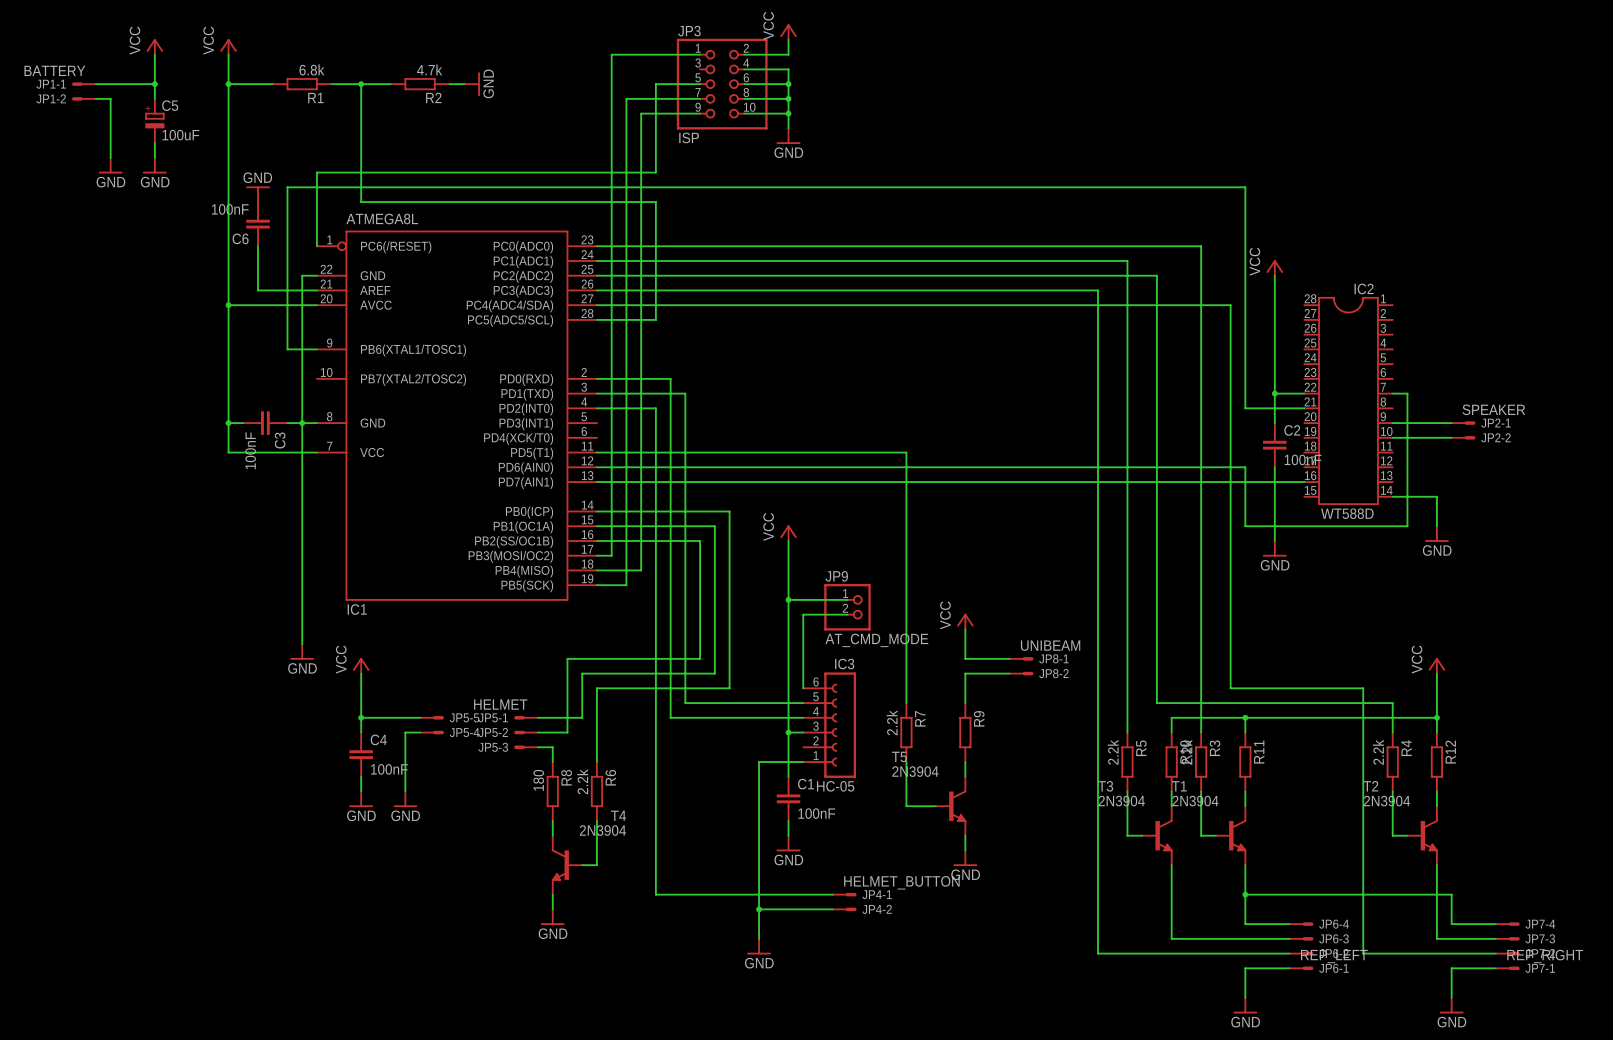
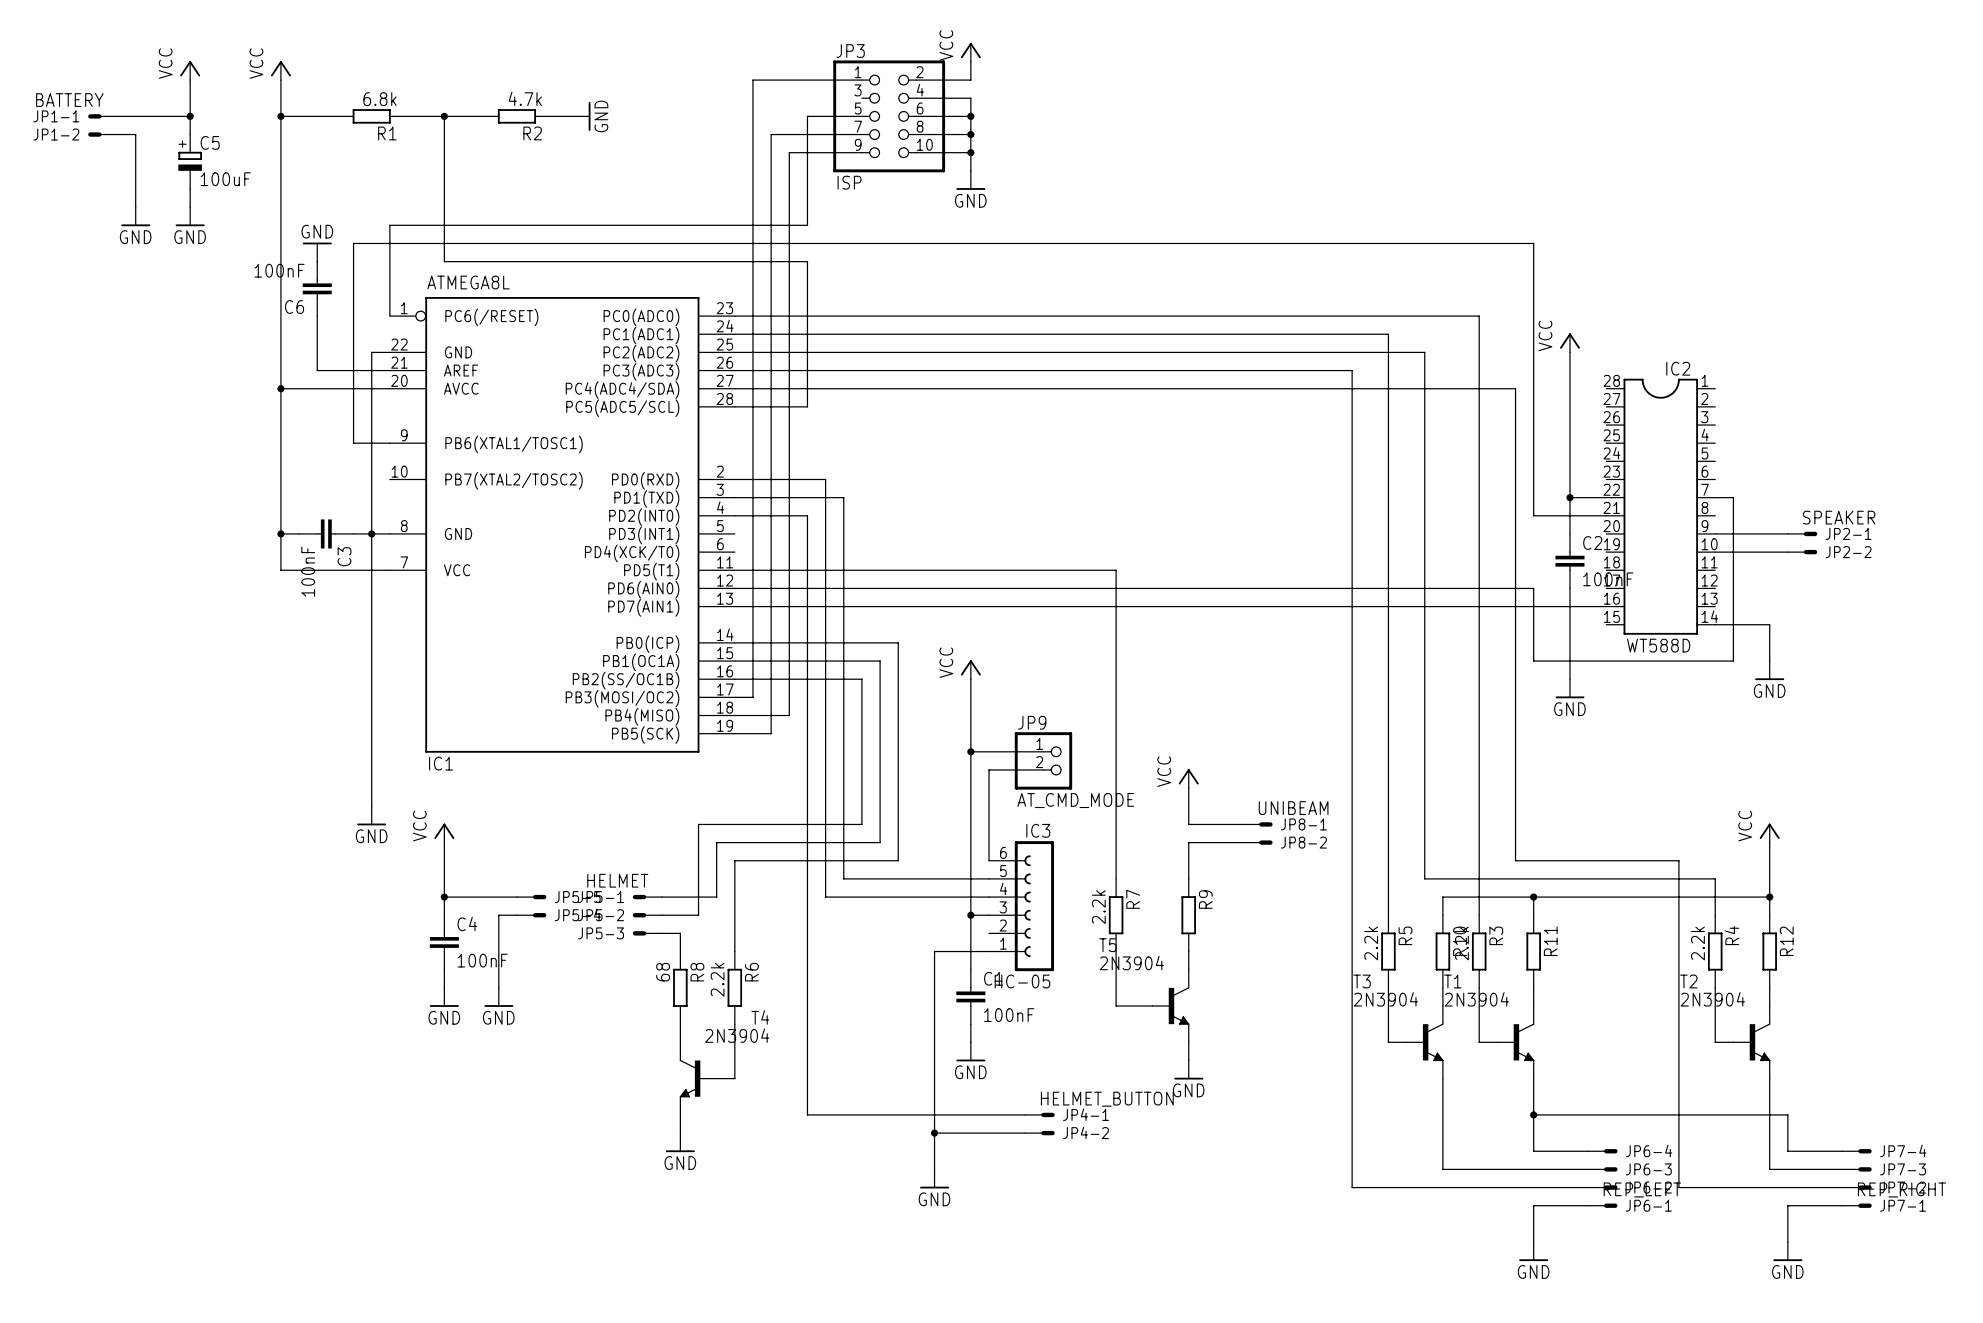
R8 value: 180 (538, 780) -> 68 (663, 972)

